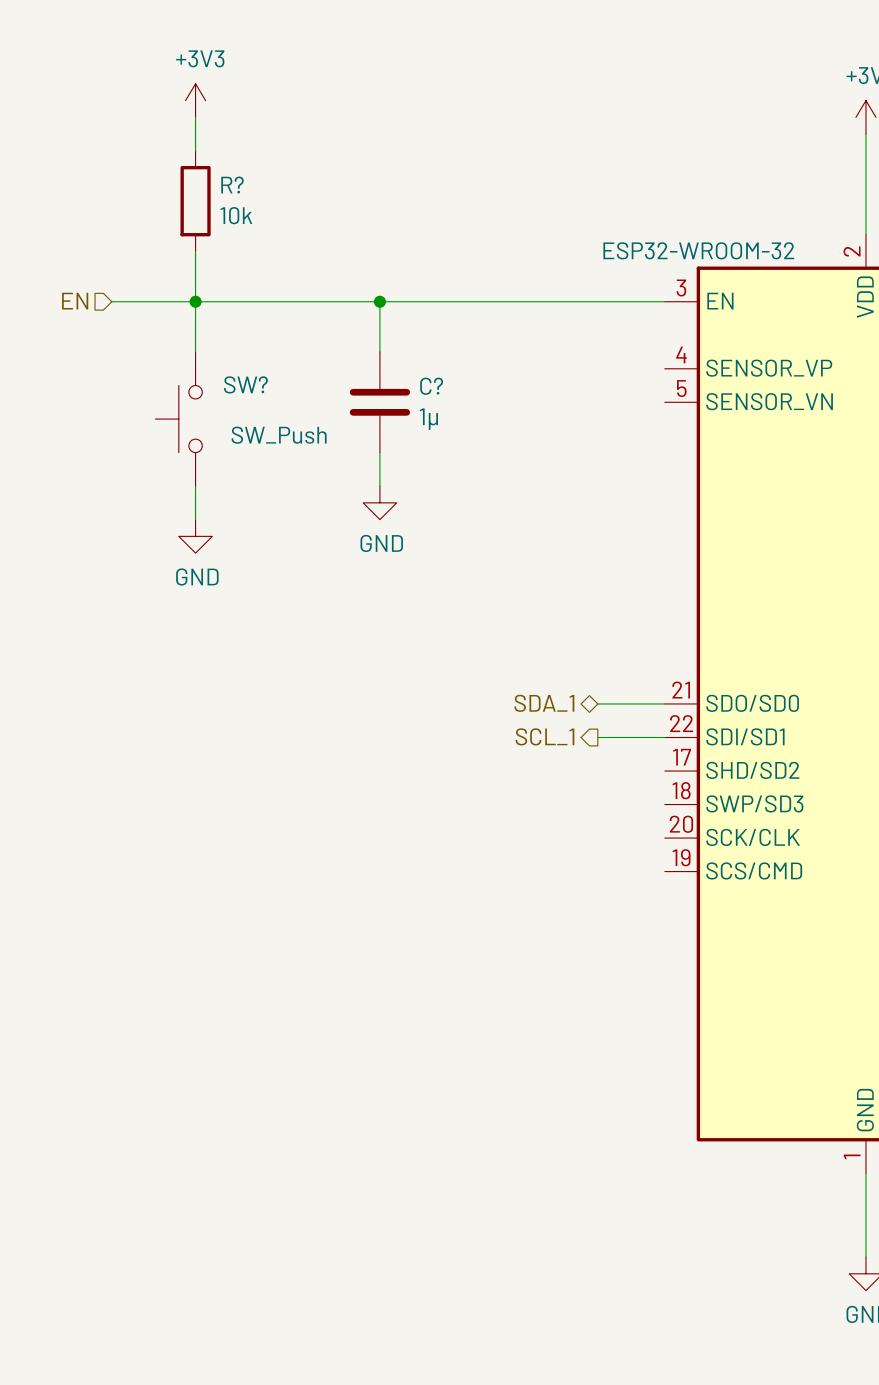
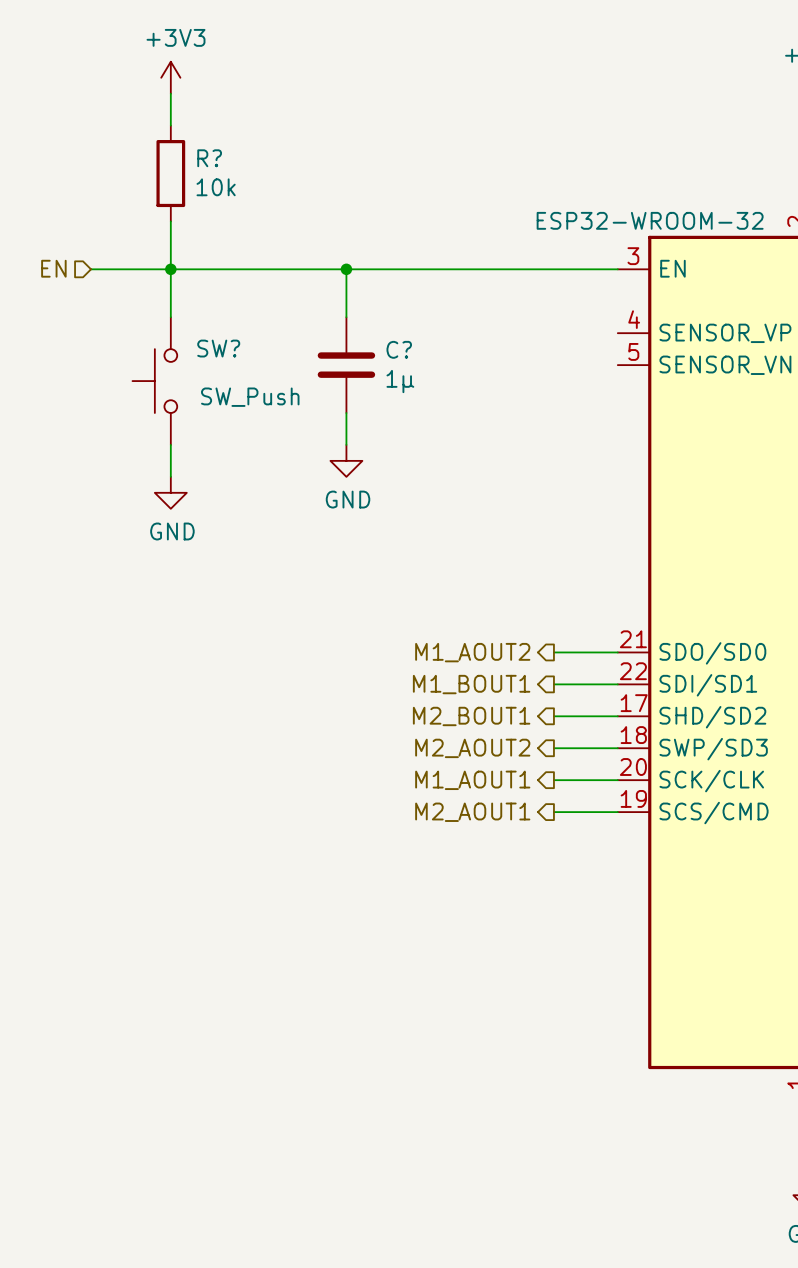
hierarchical label shape: bidirectional (544, 703) -> output (472, 652)
hierarchical label: SDA_1 (544, 703) -> M1_AOUT2 (472, 652)
hierarchical label: SCL_1 (545, 736) -> M1_BOUT1 (471, 684)
hierarchical label: none -> M2_BOUT1 (471, 716)
wire: none -> (553, 716) (617, 716)
hierarchical label: none -> M2_AOUT2 (472, 748)
wire: none -> (553, 748) (617, 748)
hierarchical label: none -> M1_AOUT1 (472, 780)
wire: none -> (553, 780) (617, 780)
hierarchical label: none -> M2_AOUT1 (472, 812)
wire: none -> (553, 812) (617, 812)

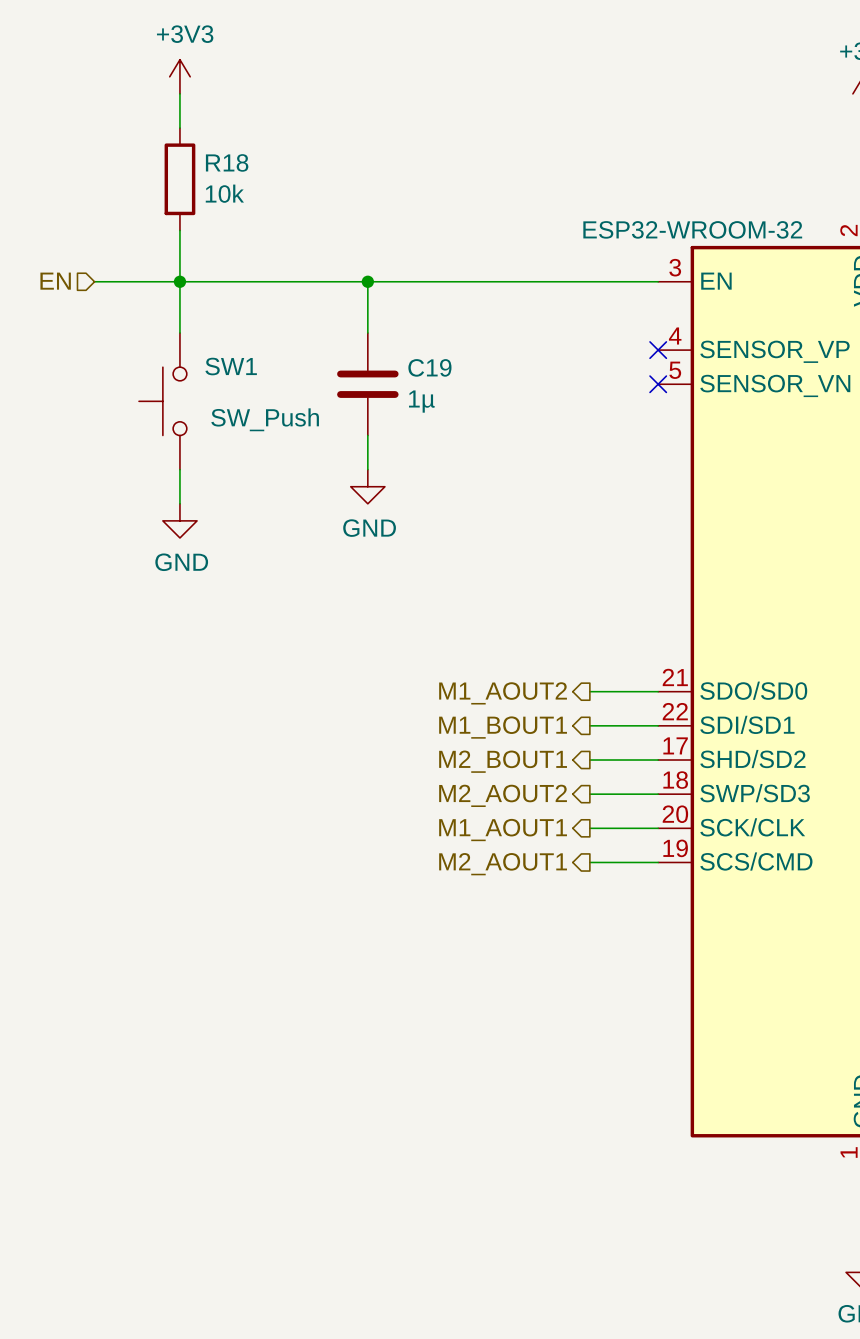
R? name: R? (209, 158) -> R18 (227, 162)
no-connect mark: none -> (658, 350)
SW? name: SW? (218, 348) -> SW1 (231, 366)
C? name: C? (399, 349) -> C19 (429, 367)
no-connect mark: none -> (658, 384)

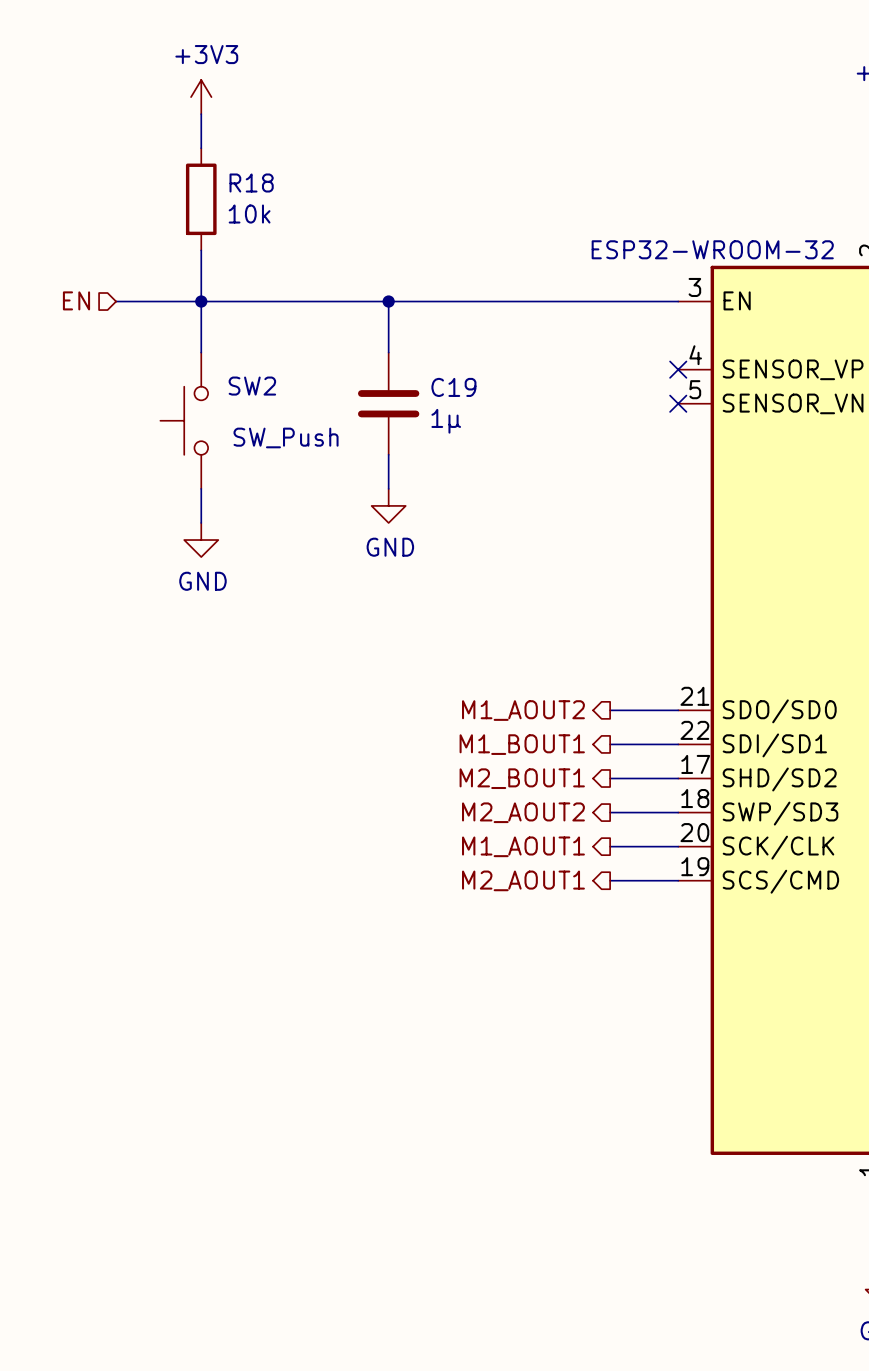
SW1 name: SW1 (231, 366) -> SW2 (252, 386)

